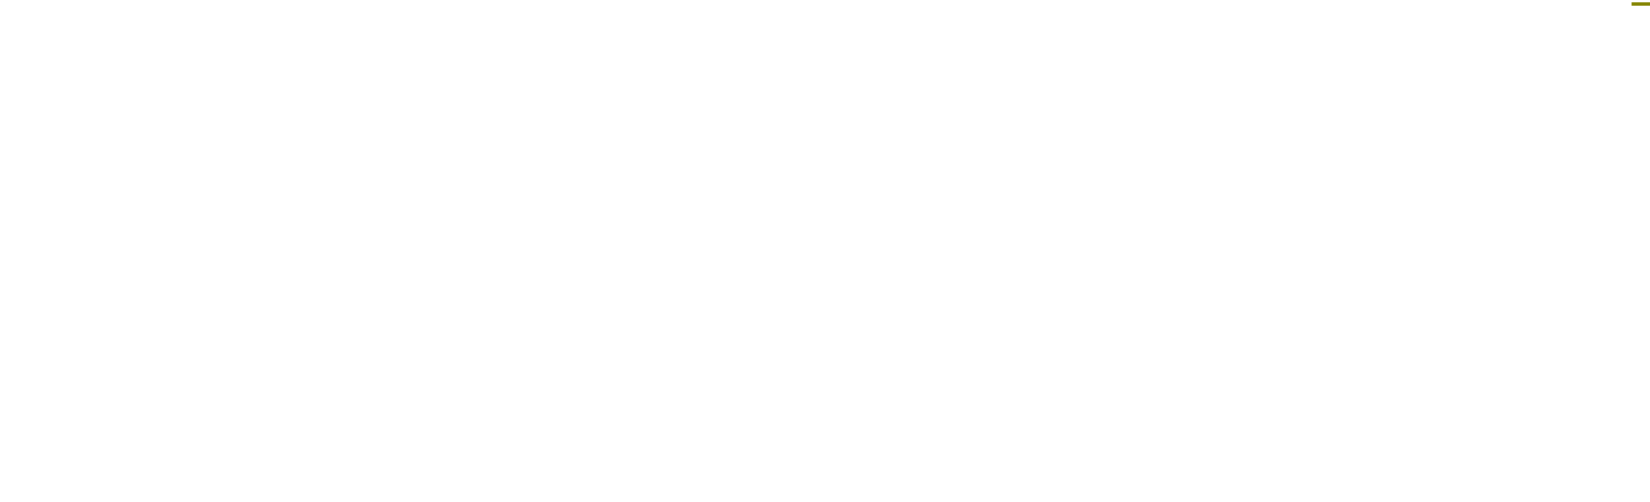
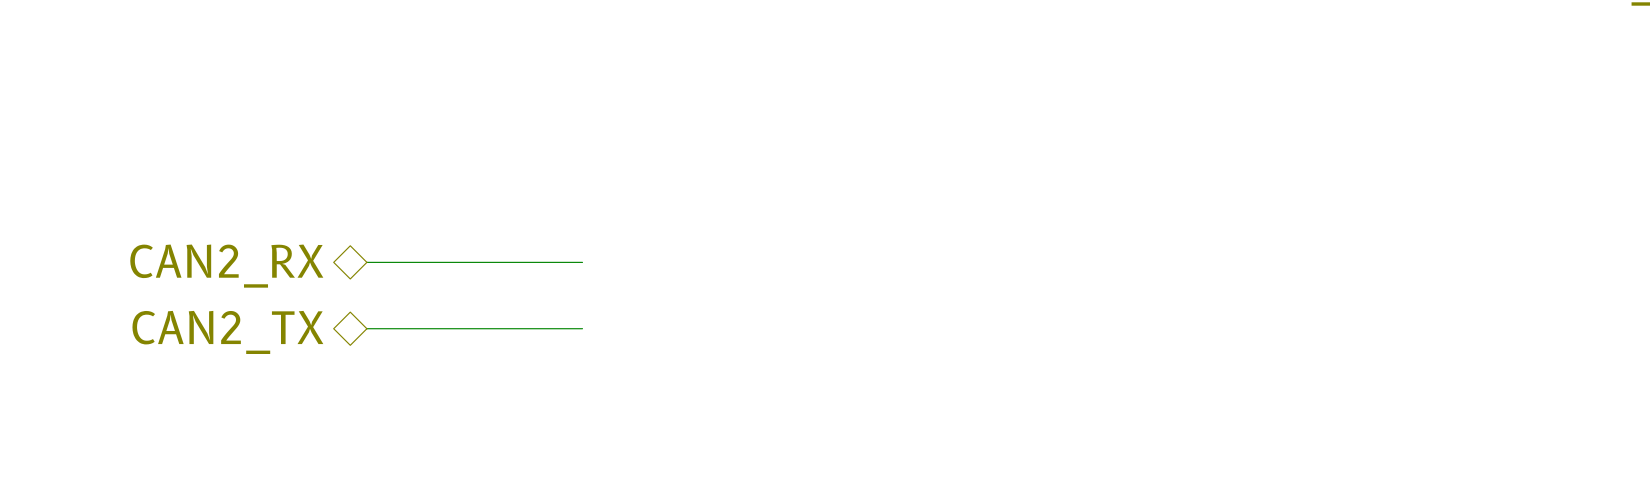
wire: none -> (366, 262) (582, 262)
hierarchical label: none -> CAN2_RX (226, 266)
wire: none -> (366, 328) (582, 328)
hierarchical label: none -> CAN2_TX (227, 332)

